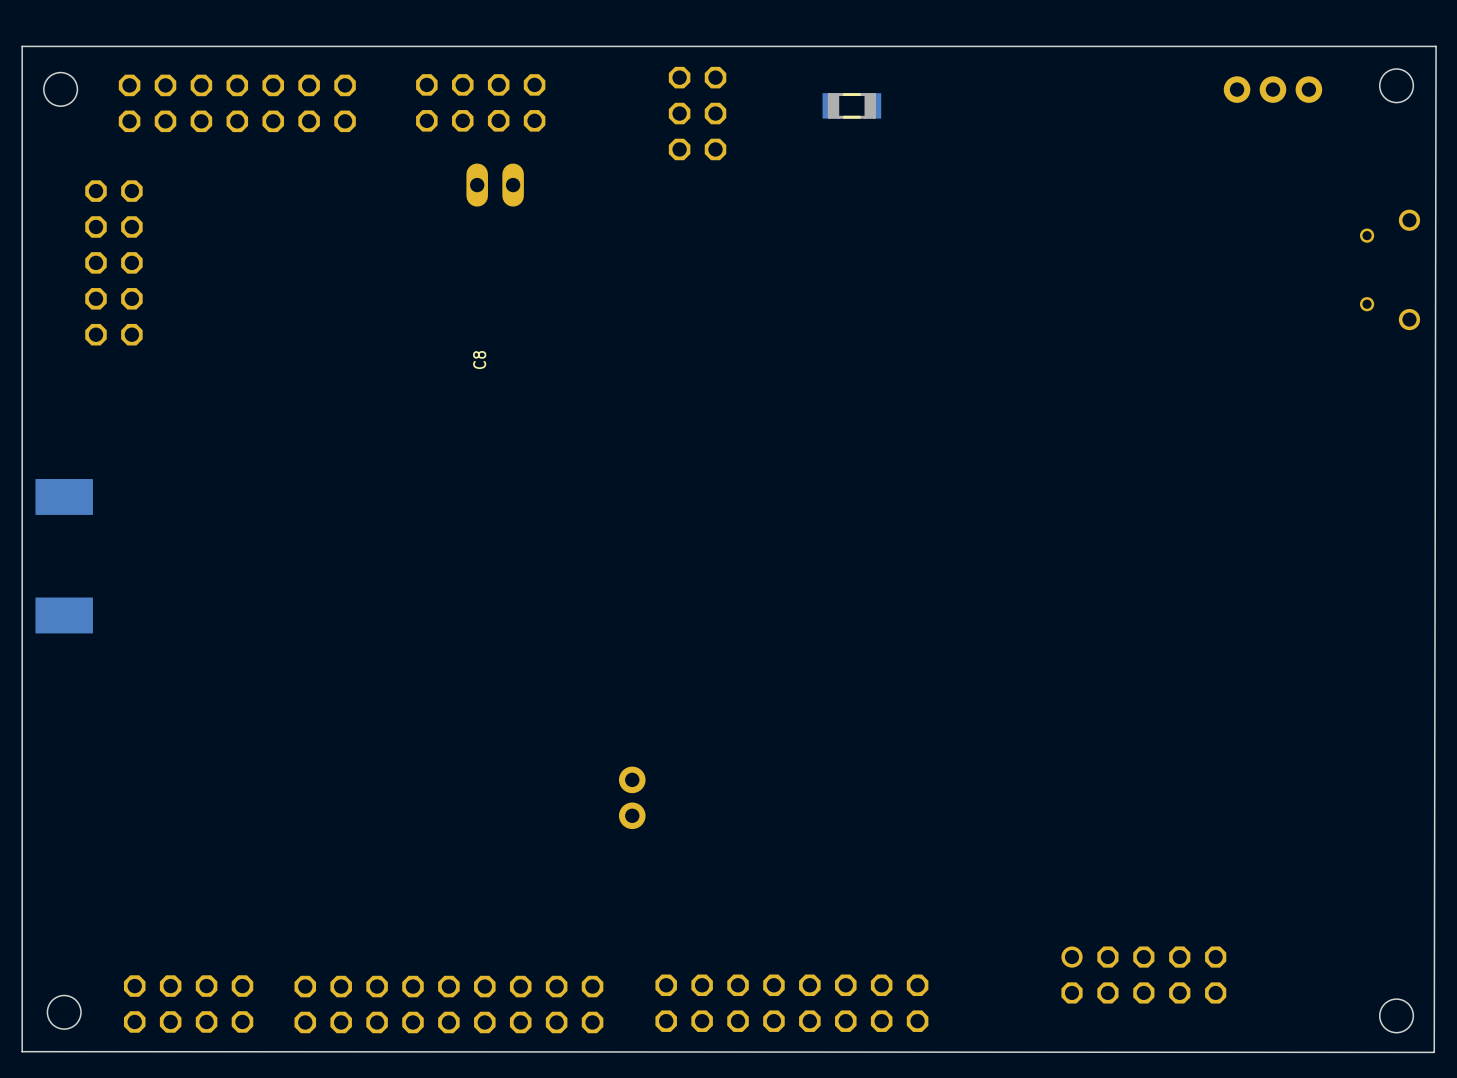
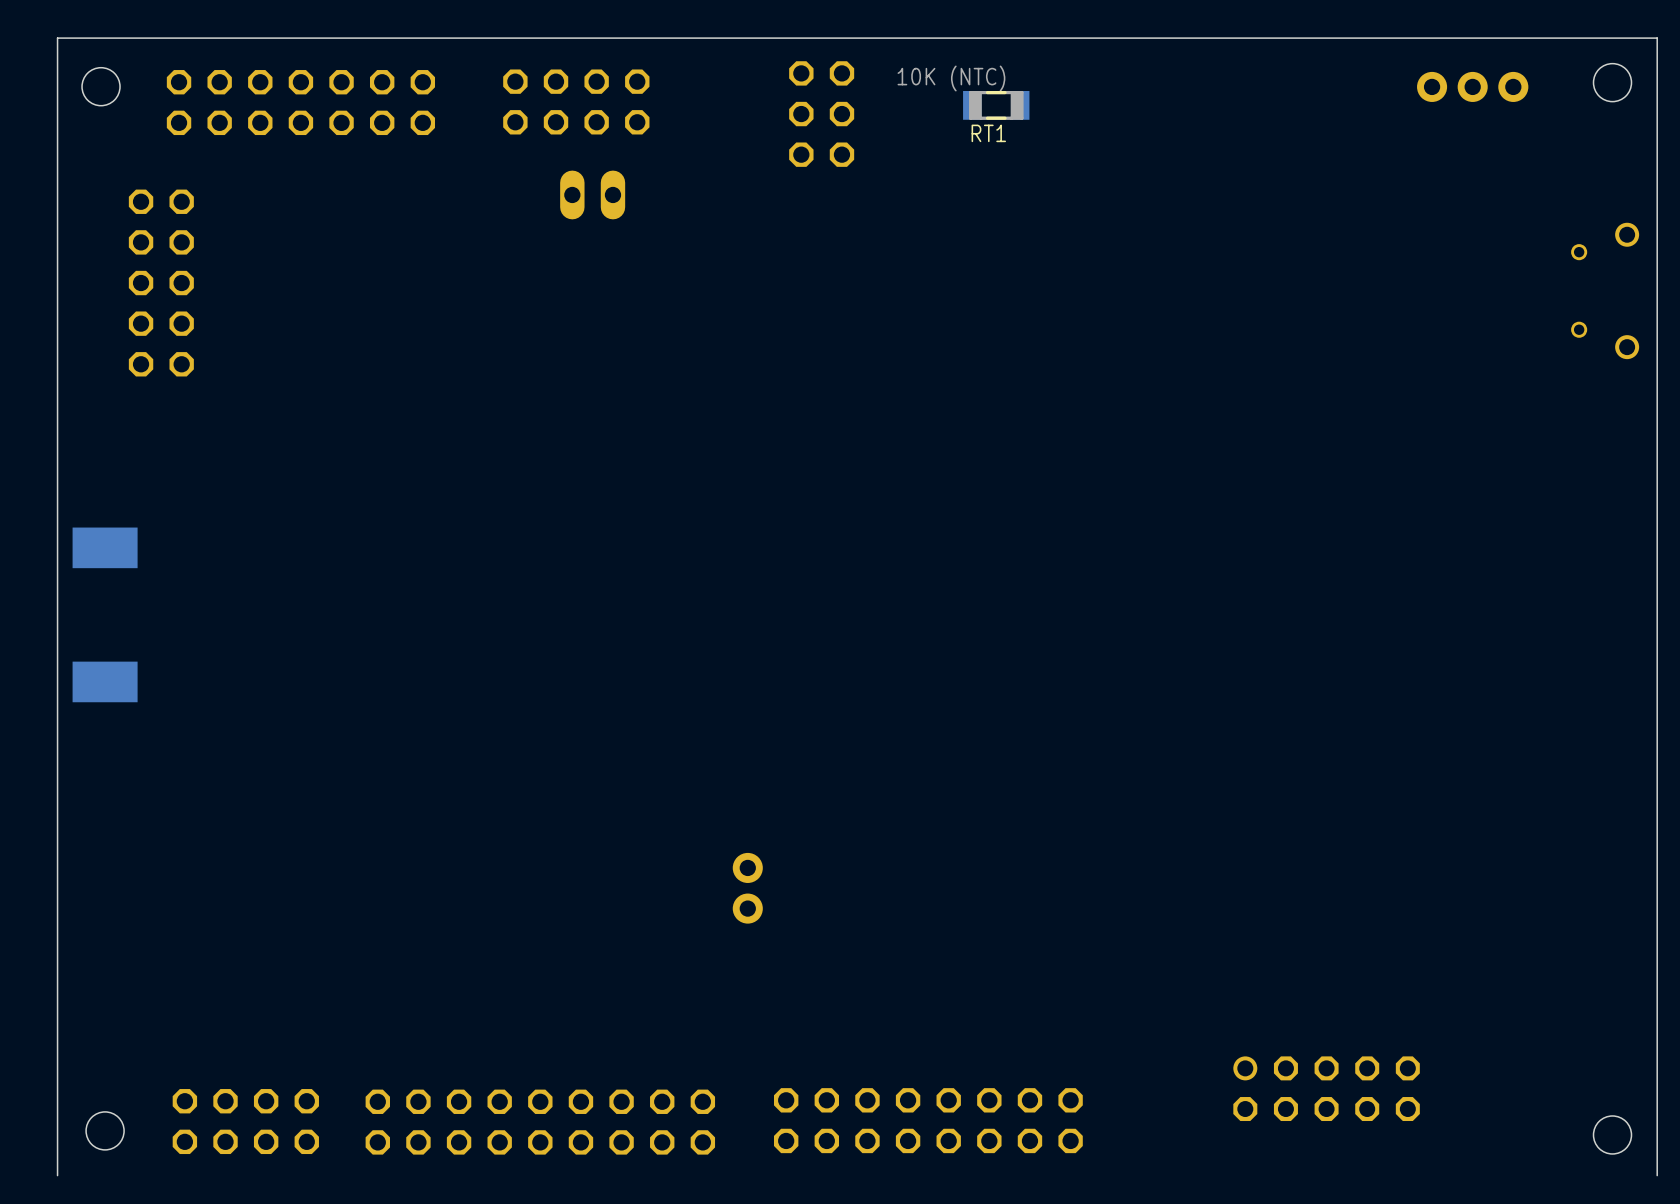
board edge: (1436, 46) (1434, 1052) (22, 1051) -> (1657, 38) (1657, 1175)
RT1 value: none -> 10K (NTC) (951, 78)
RT1 name: none -> RT1 (988, 133)
C8: (479, 360) -> none

